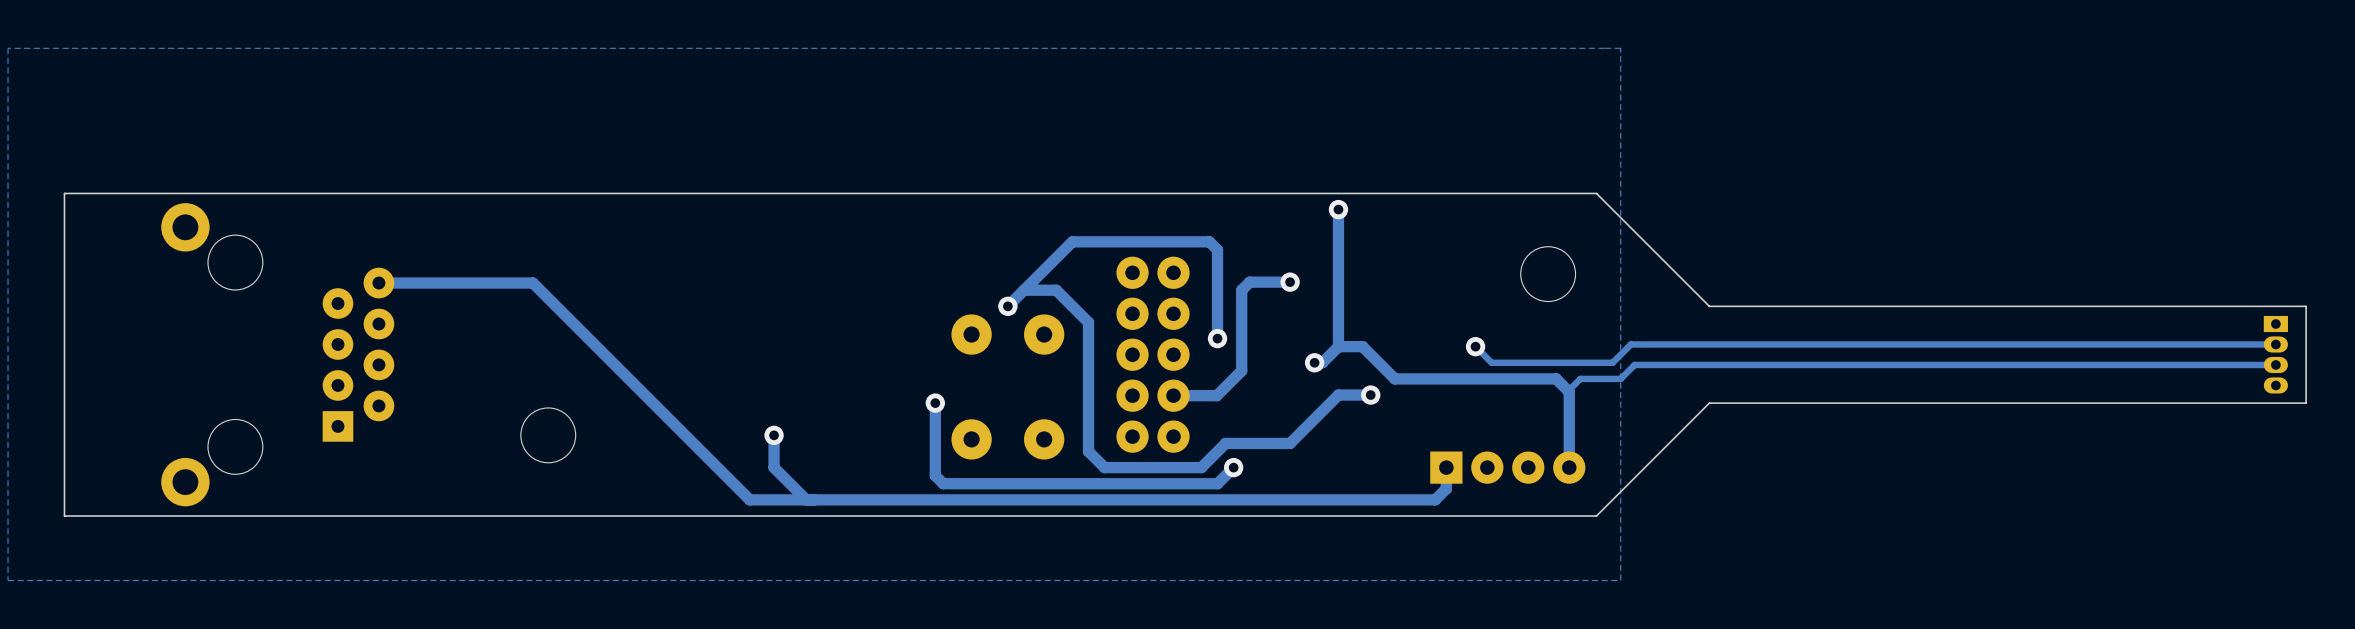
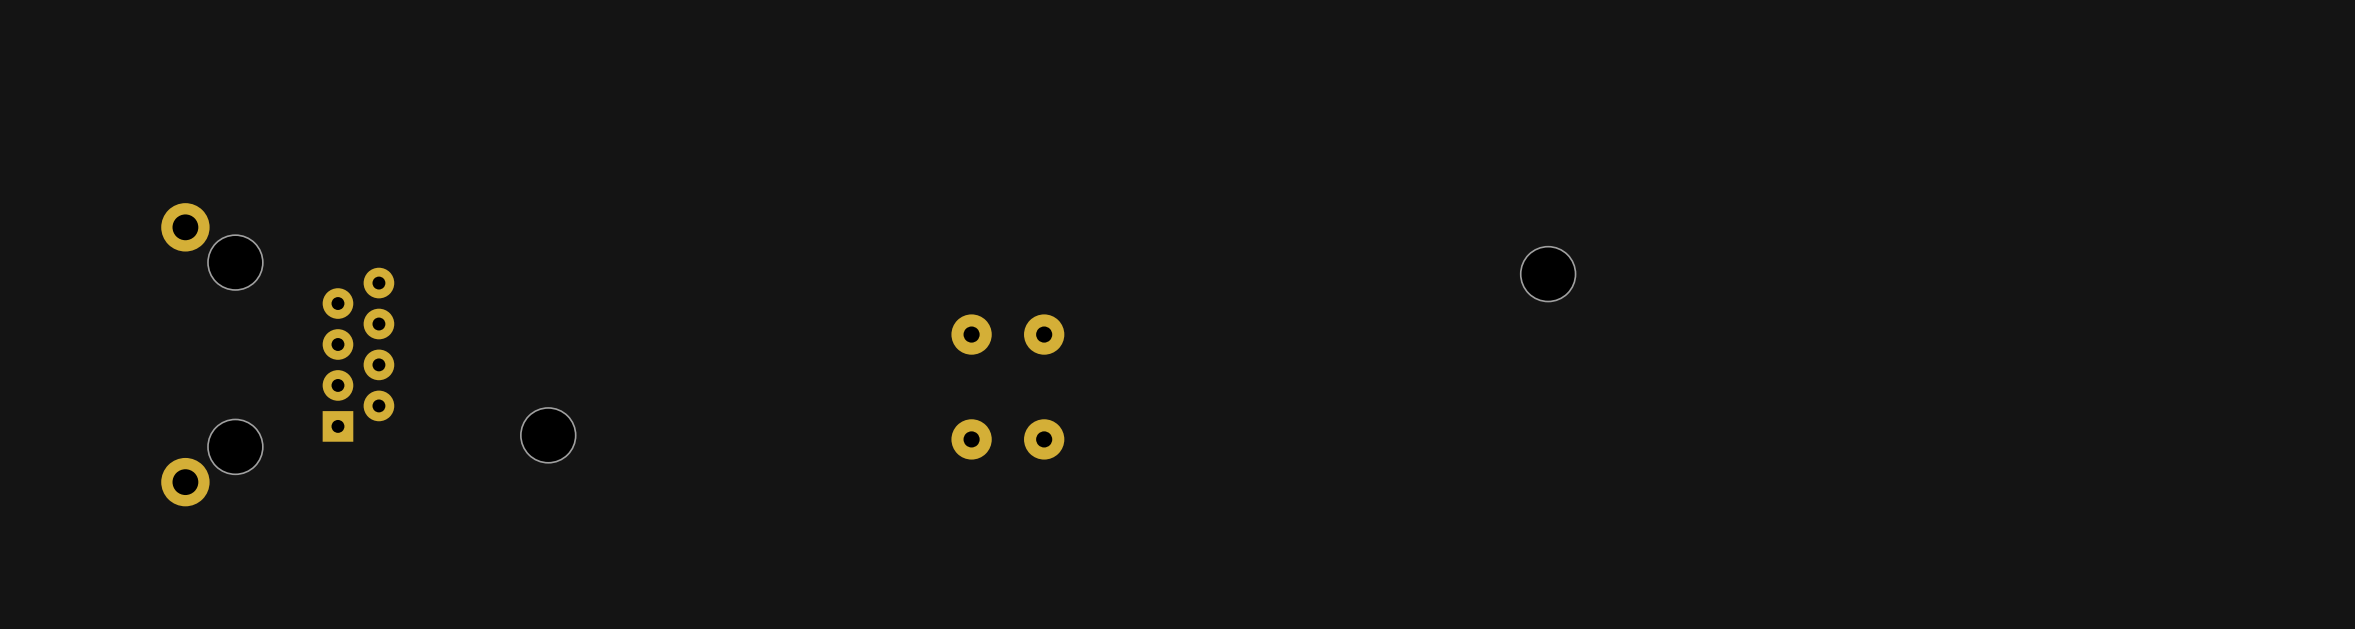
zone outline: (1620, 48) (8, 48) (8, 580) (1620, 580) (1620, 48) -> none
board edge: (1596, 193) (64, 193) (64, 516) (1596, 516) (1709, 403) (2306, 403) (2306, 306) (1709, 306) (1596, 193) -> none
track: (1338, 209) (1338, 346) -> none
via: (1338, 209) -> none
track: (1290, 282) (1249, 282) (1241, 290) (1241, 370) (1216, 395) (1173, 395) -> none
via: (1290, 282) -> none
track: (378, 283) (533, 283) (749, 499) (1435, 499) (1446, 488) (1446, 467) -> none
track: (1024, 290) (1056, 290) (1088, 322) (1088, 451) (1104, 467) (1201, 467) (1225, 443) (1290, 443) (1338, 395) (1370, 395) -> none
track: (1007, 306) (1072, 241) (1209, 241) (1217, 249) (1217, 338) -> none
via: (1007, 306) -> none
via: (1217, 338) -> none
track: (2275, 344) (1630, 344) (1612, 362) (1491, 362) (1475, 346) -> none
track: (1338, 346) (1362, 346) (1394, 378) (1556, 378) (1569, 391) (1569, 467) (1569, 390) (1580, 378) (1620, 378) (1634, 364) (2275, 364) -> none
track: (1338, 346) (1322, 362) (1314, 362) -> none
via: (1475, 346) -> none
part: (1153, 354) -> none
part: (2275, 354) -> none
via: (1314, 362) -> none
via: (1370, 395) -> none
track: (935, 403) (935, 475) (943, 483) (1217, 483) (1233, 467) -> none
via: (935, 403) -> none
track: (774, 435) (774, 467) (806, 499) -> none
via: (774, 435) -> none
via: (1233, 467) -> none
part: (1507, 467) -> none

